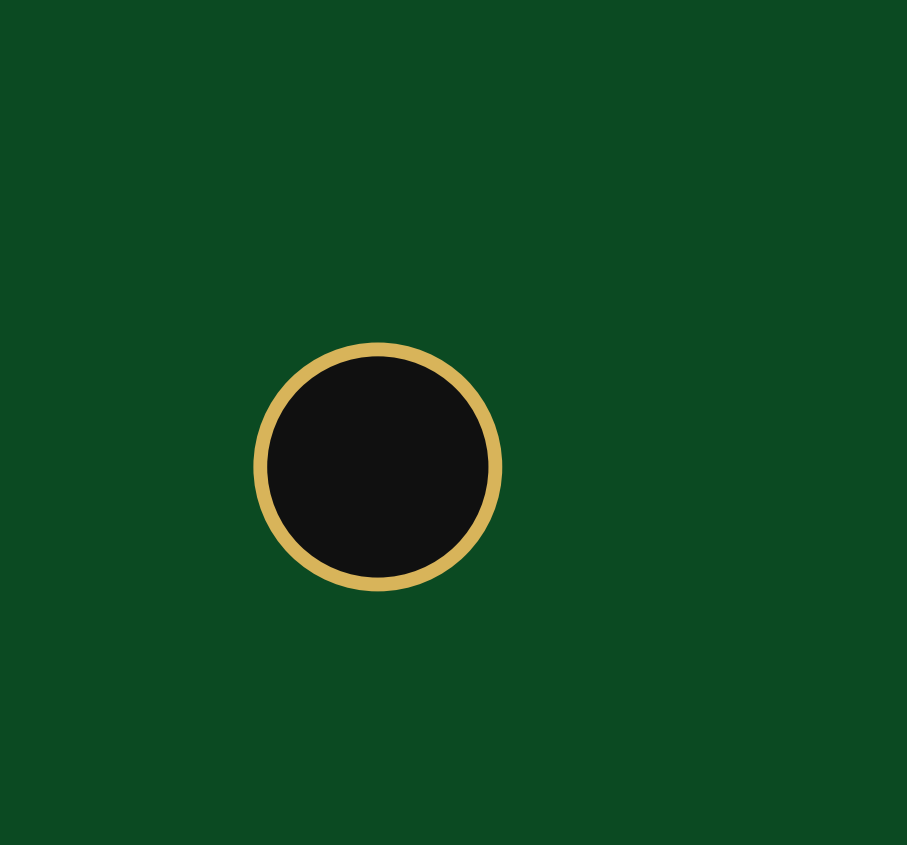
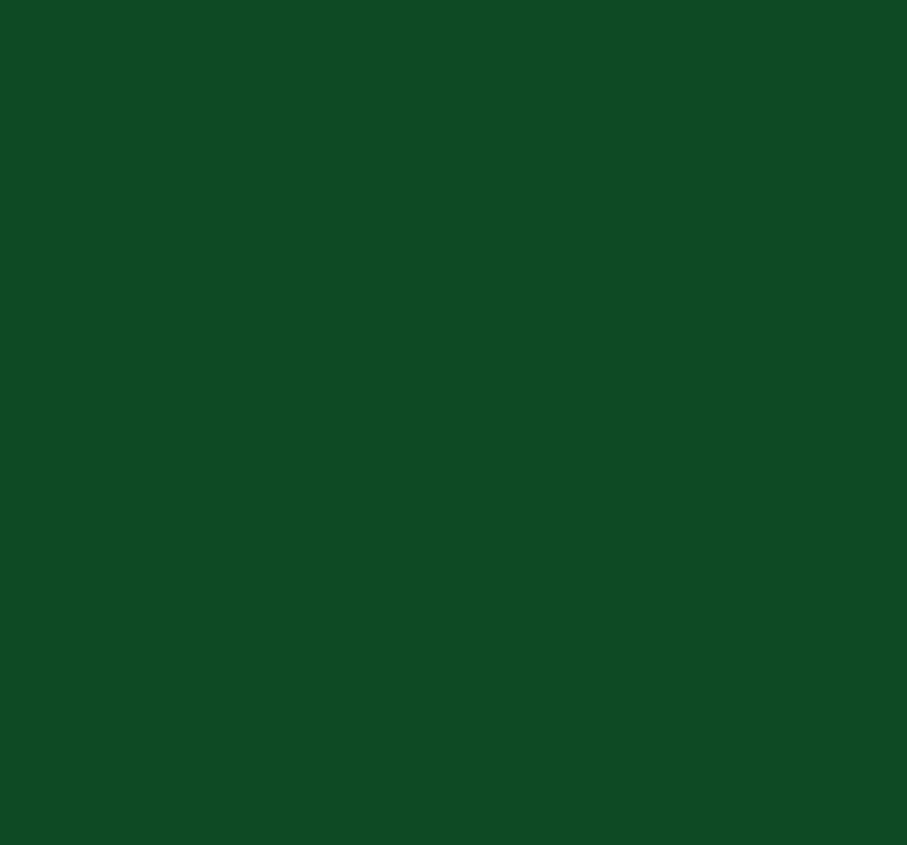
part: (377, 466) -> none

